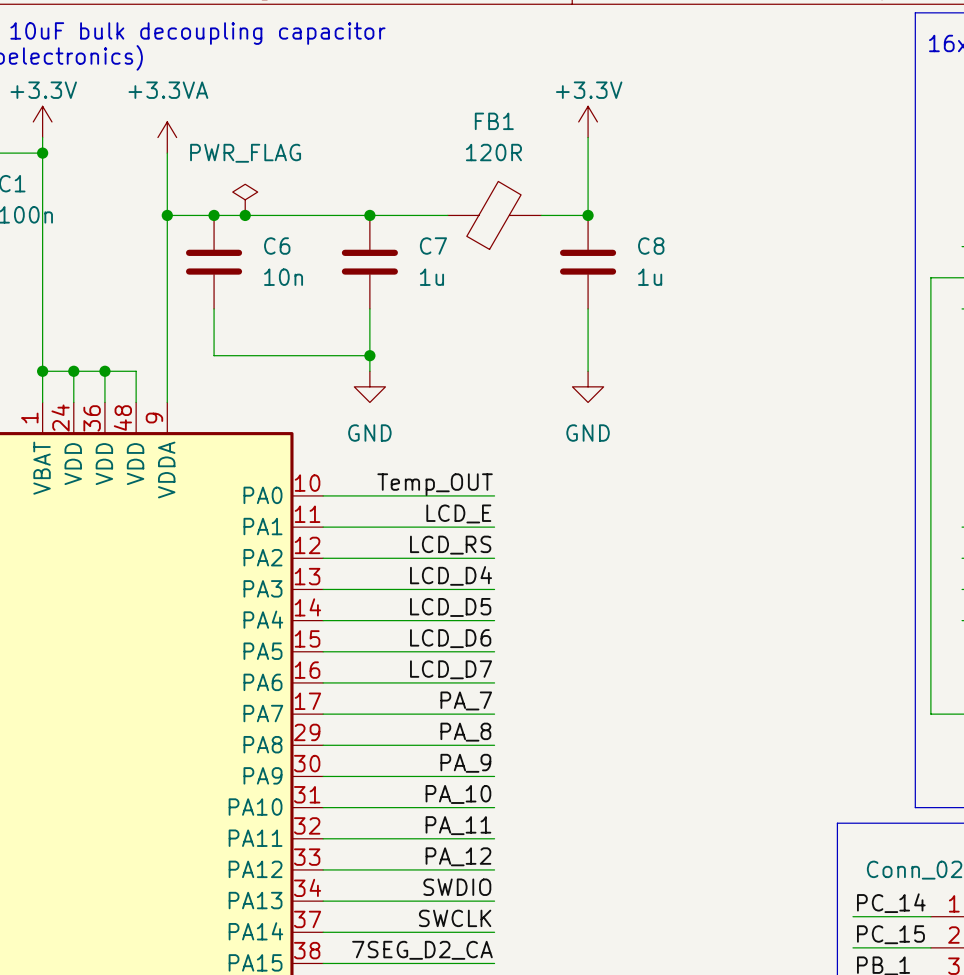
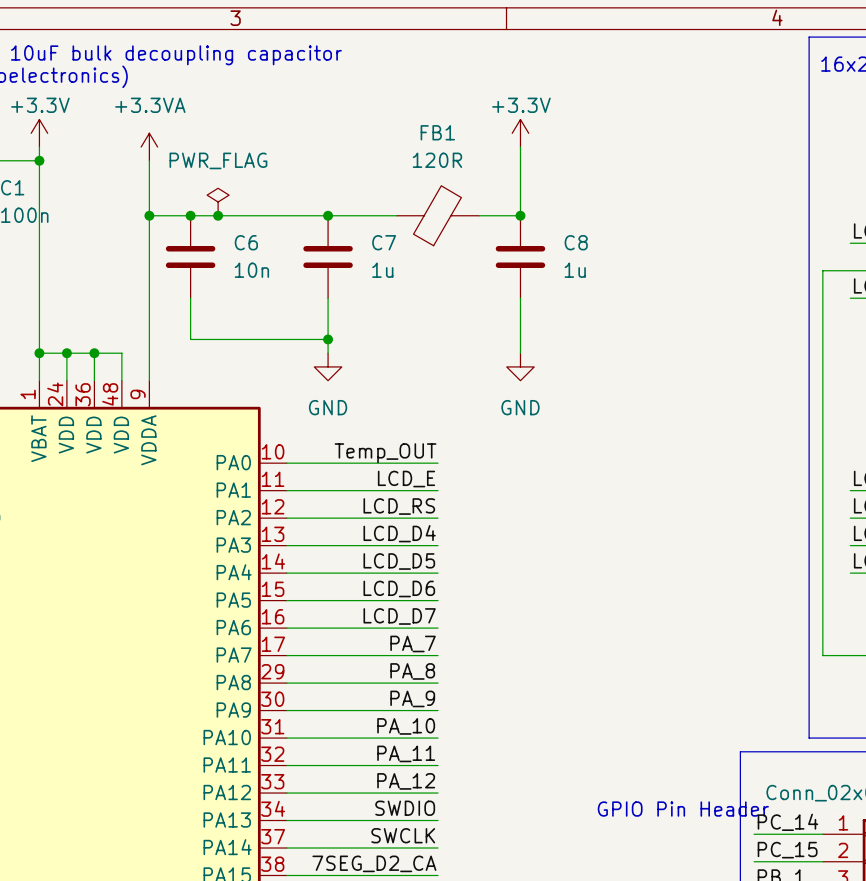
text: none -> GPIO Pin Header (683, 809)

